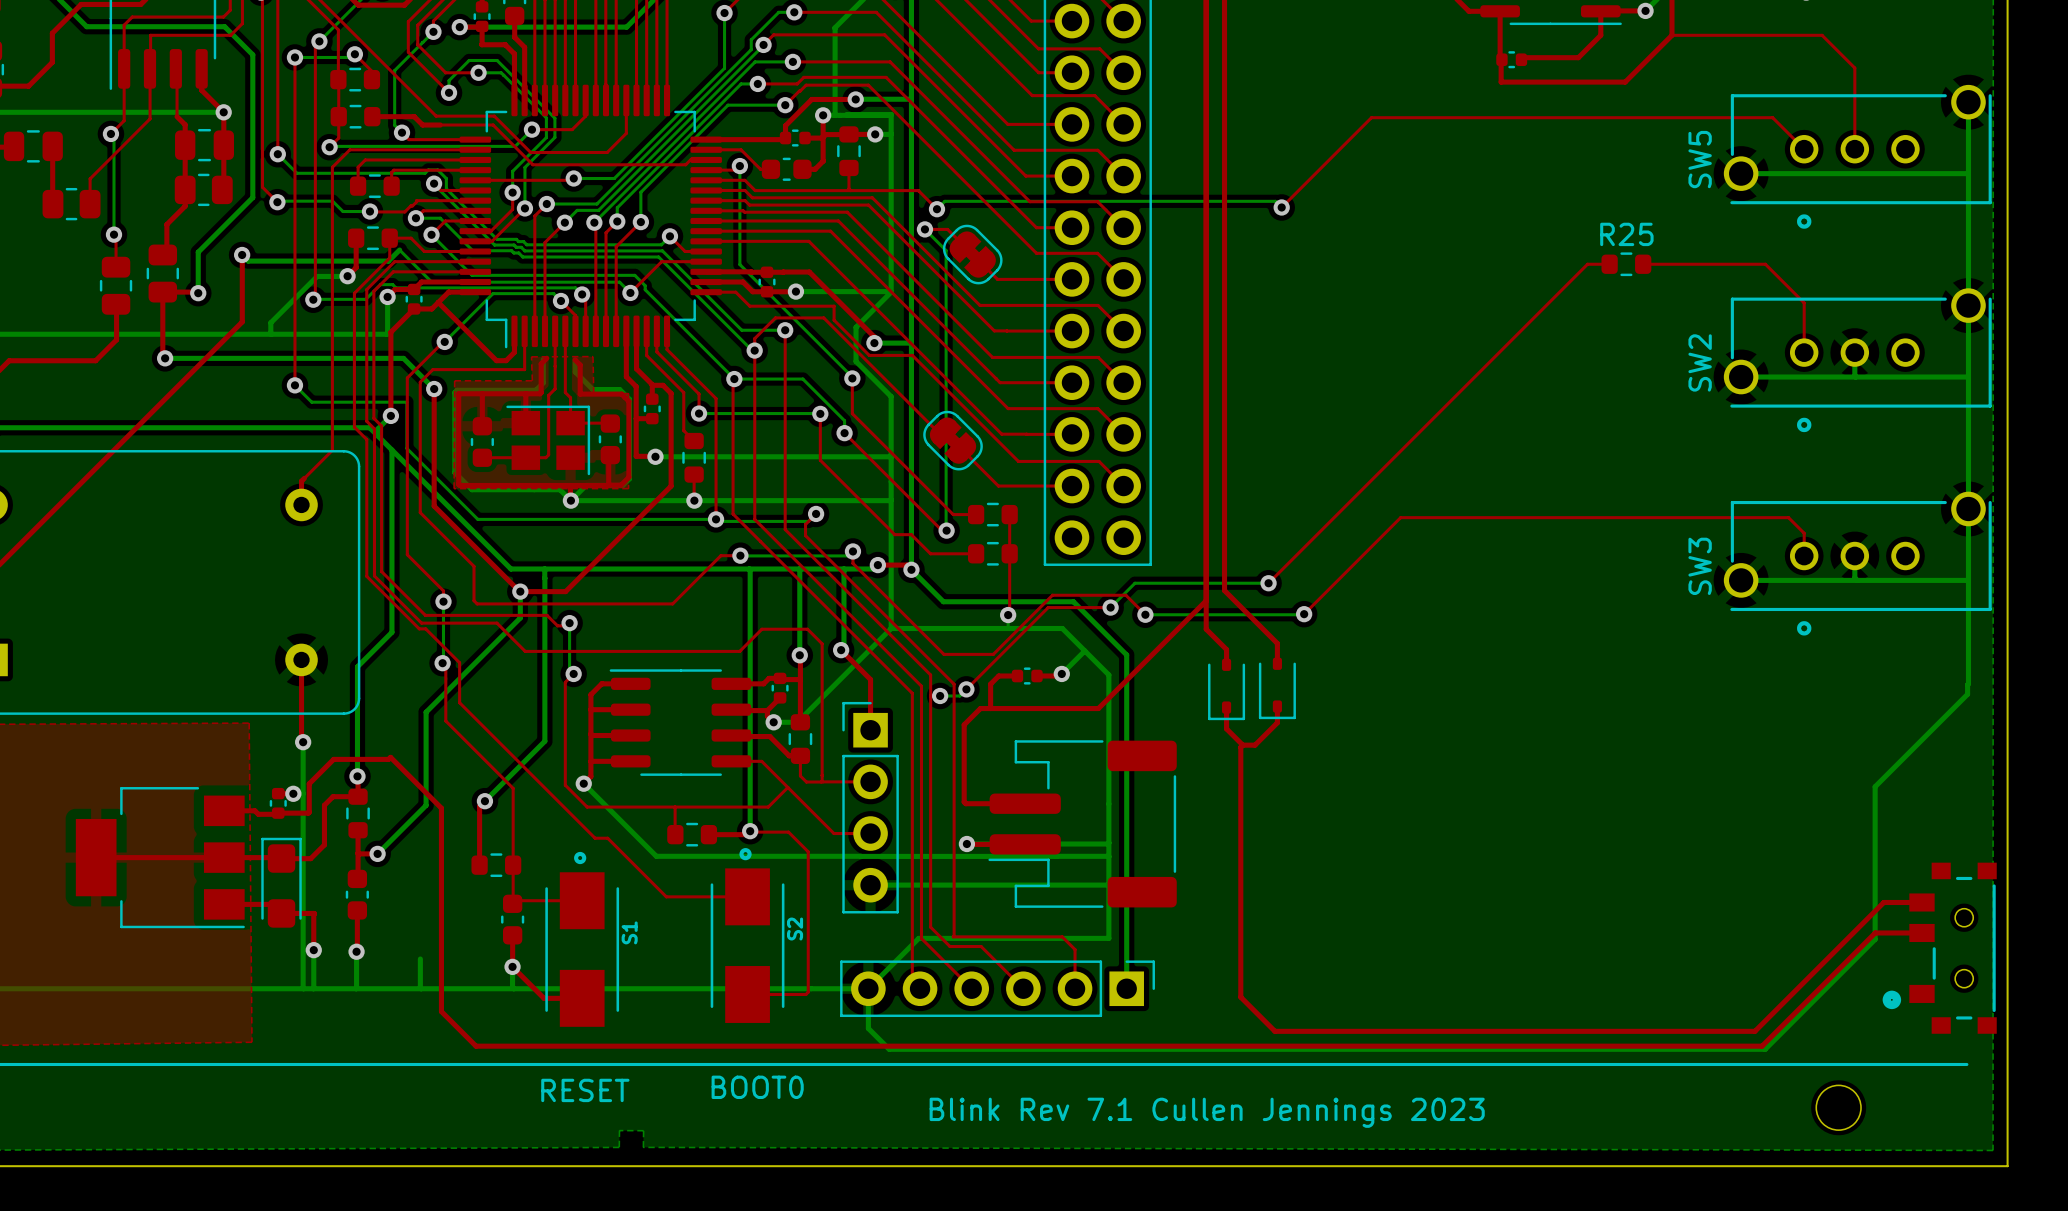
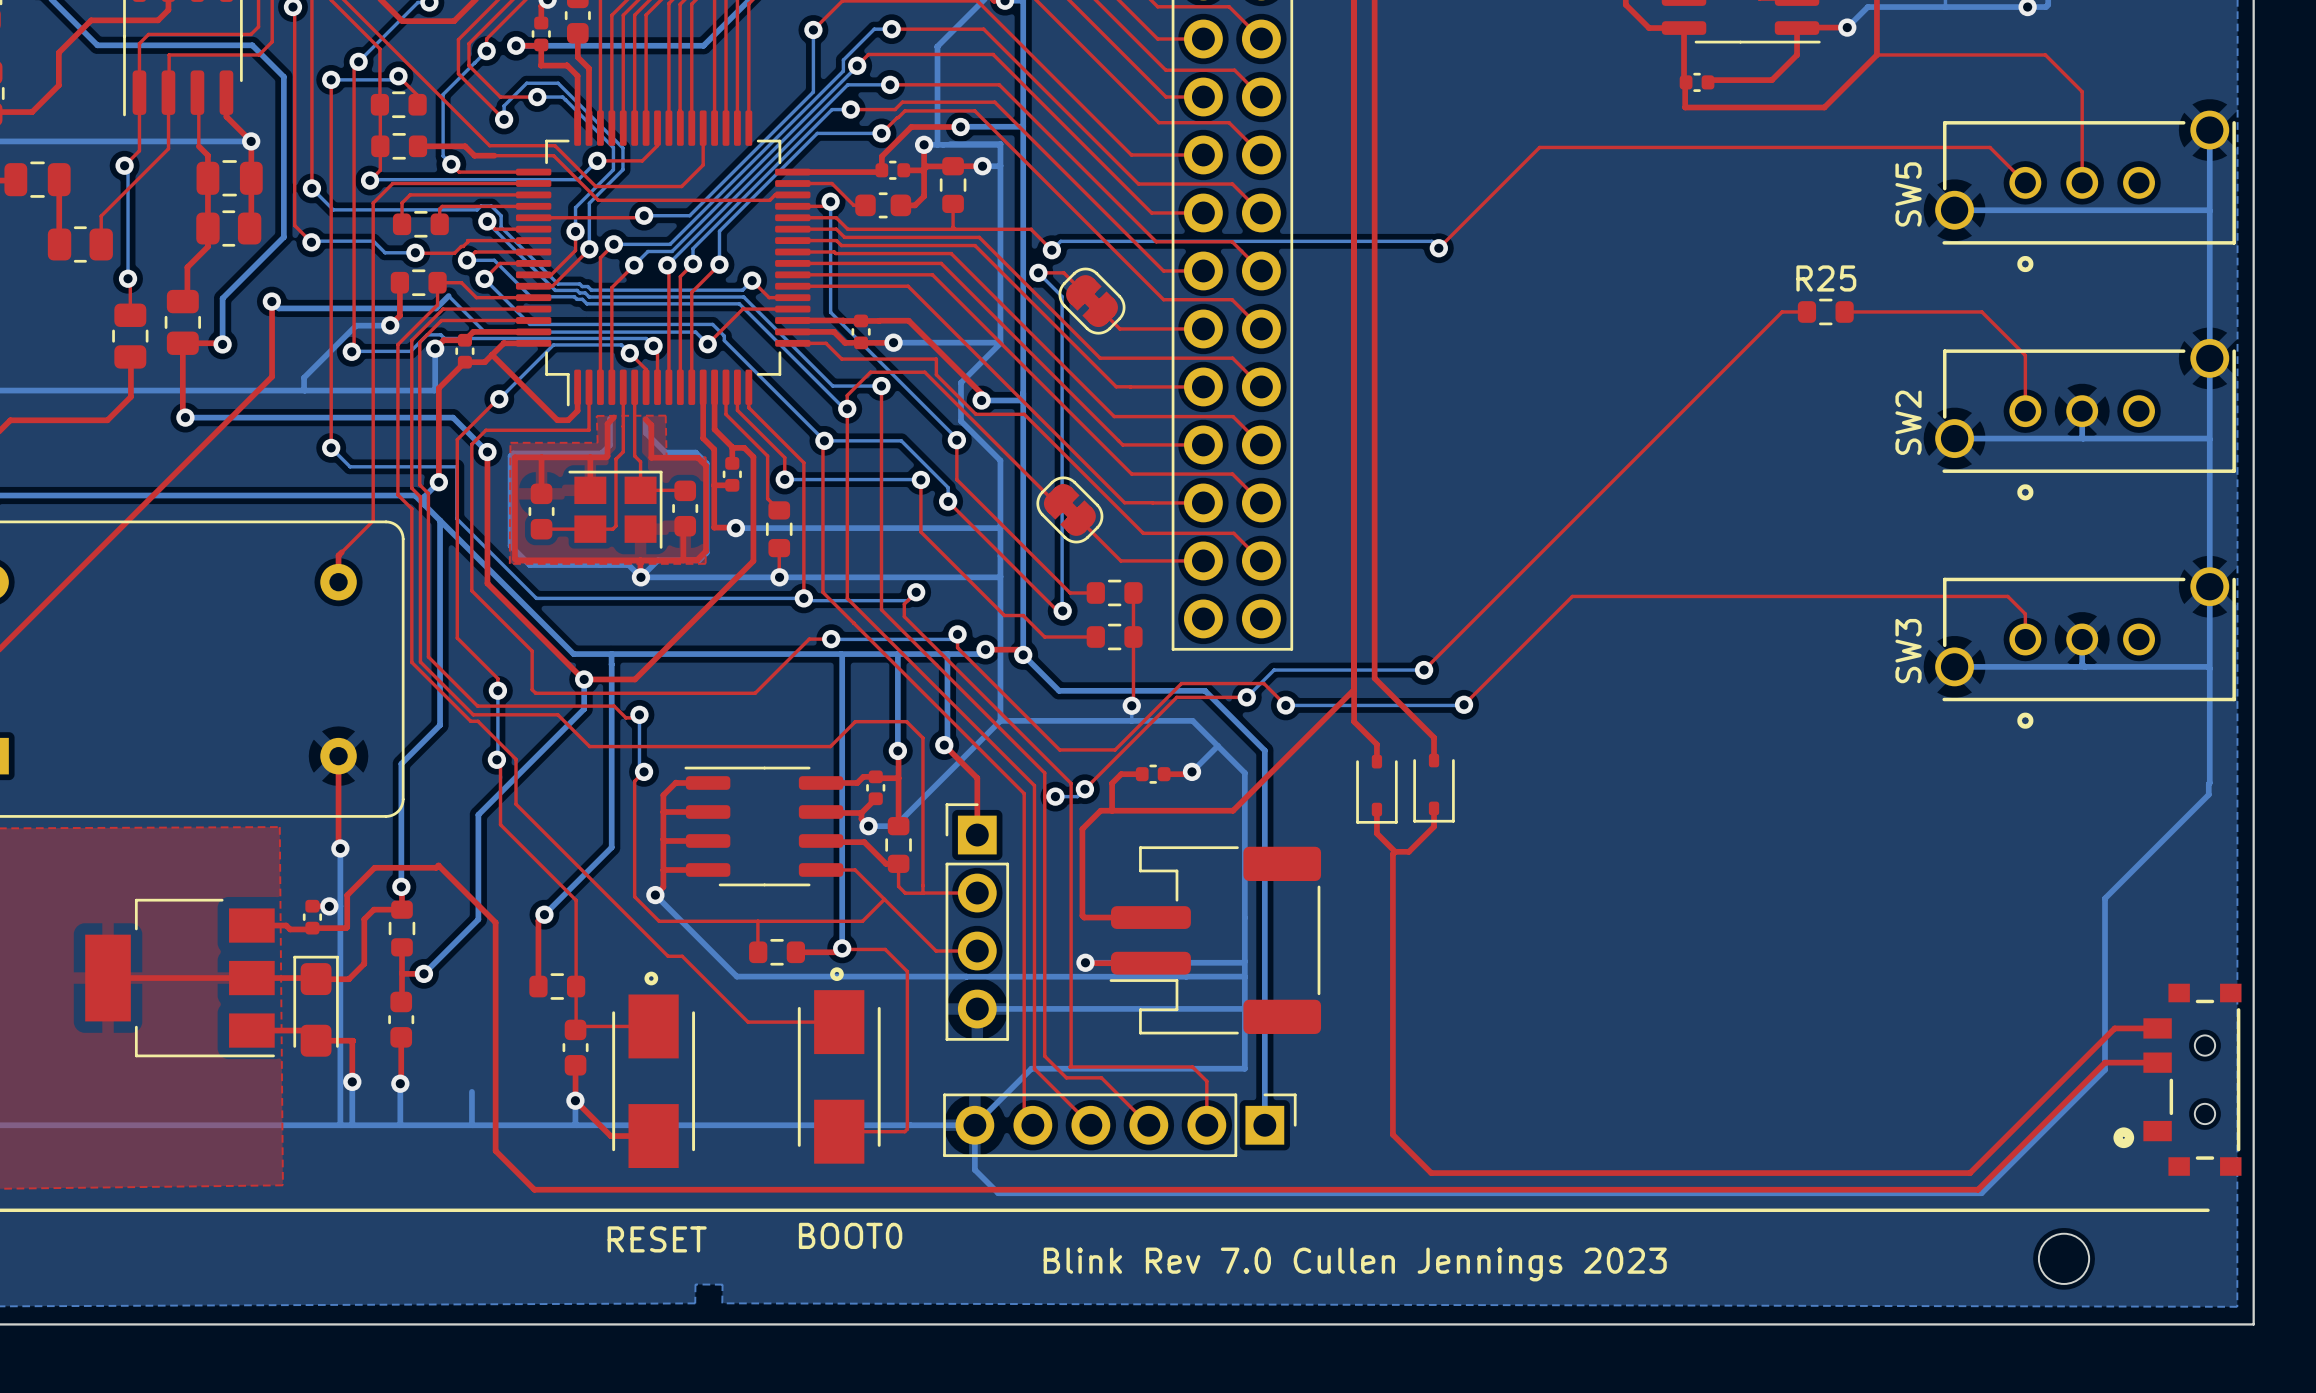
S2 name: S2 (795, 929) -> none
S1 name: S1 (629, 932) -> none
text: Blink Rev 7.1 Cullen Jennings 2023 (1207, 1112) -> Blink Rev 7.0 Cullen Jennings 2023 (1355, 1264)

